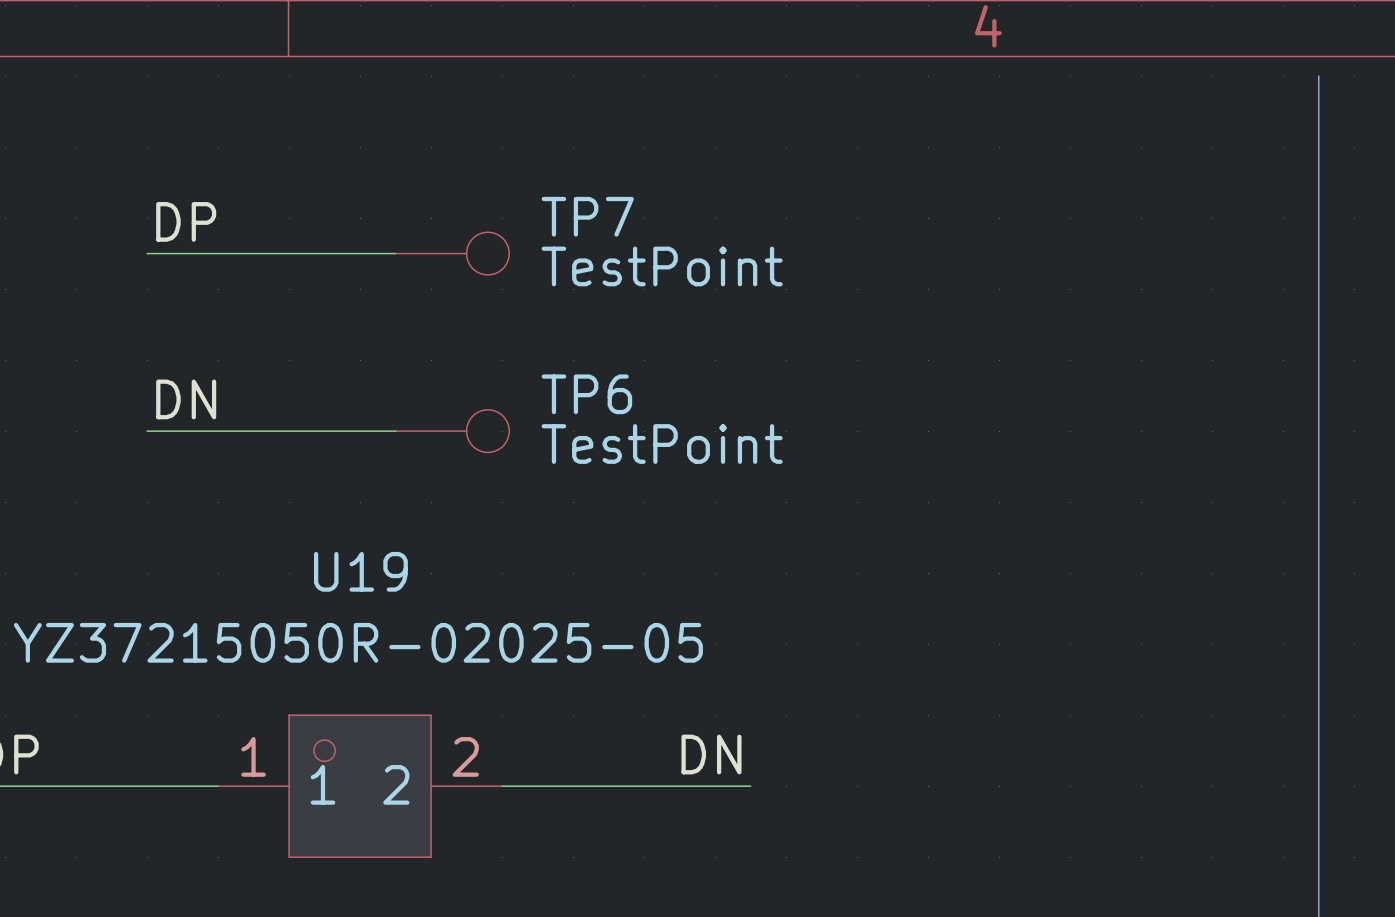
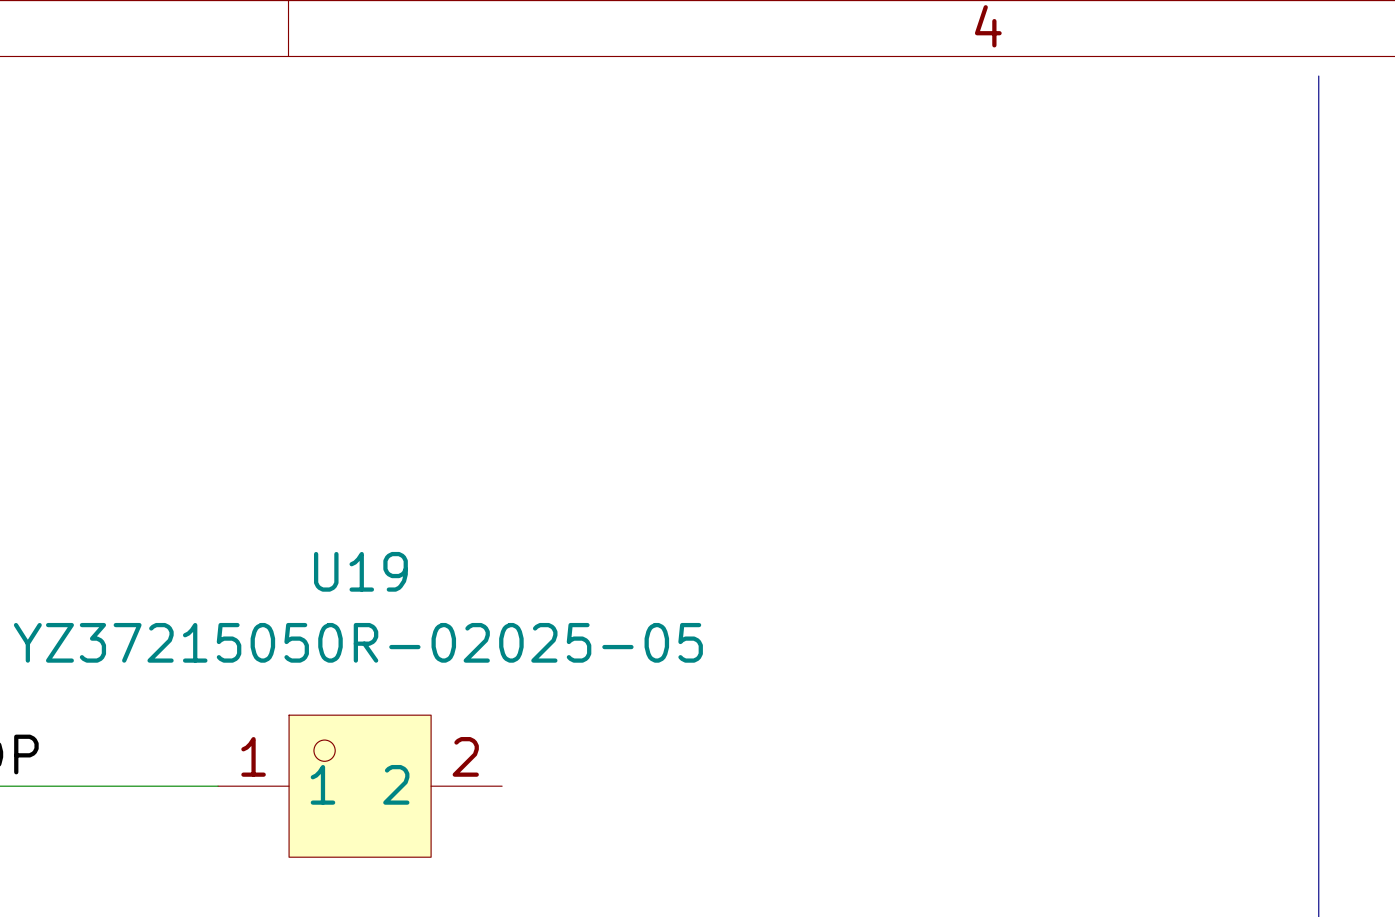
label: DP (186, 221) -> none
wire: (147, 253) (395, 253) -> none
TP7: TestPoint (452, 253) -> none
label: DN (186, 399) -> none
wire: (147, 431) (395, 431) -> none
TP6: TestPoint (452, 431) -> none
label: DN (711, 754) -> none
wire: (502, 786) (750, 786) -> none

